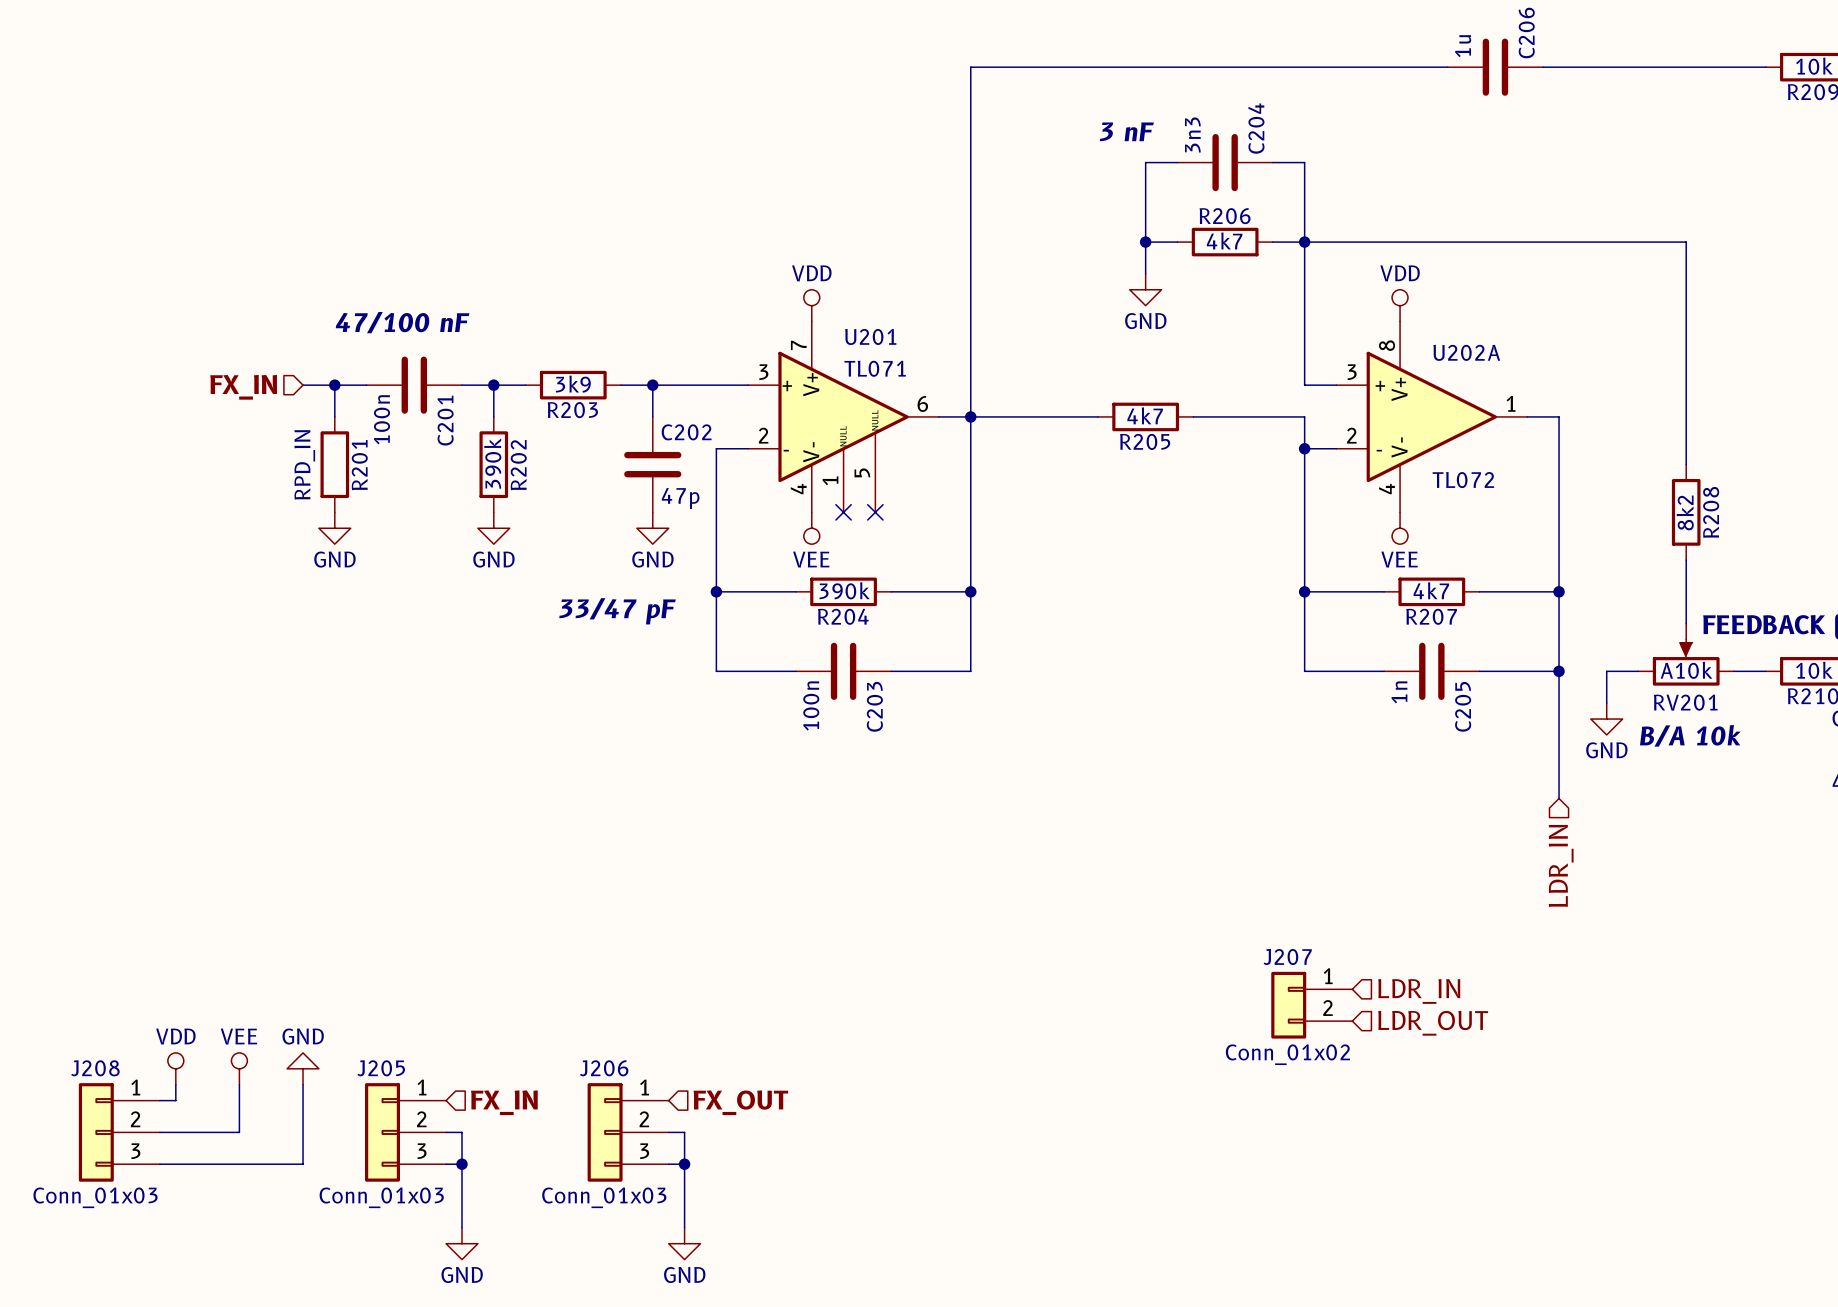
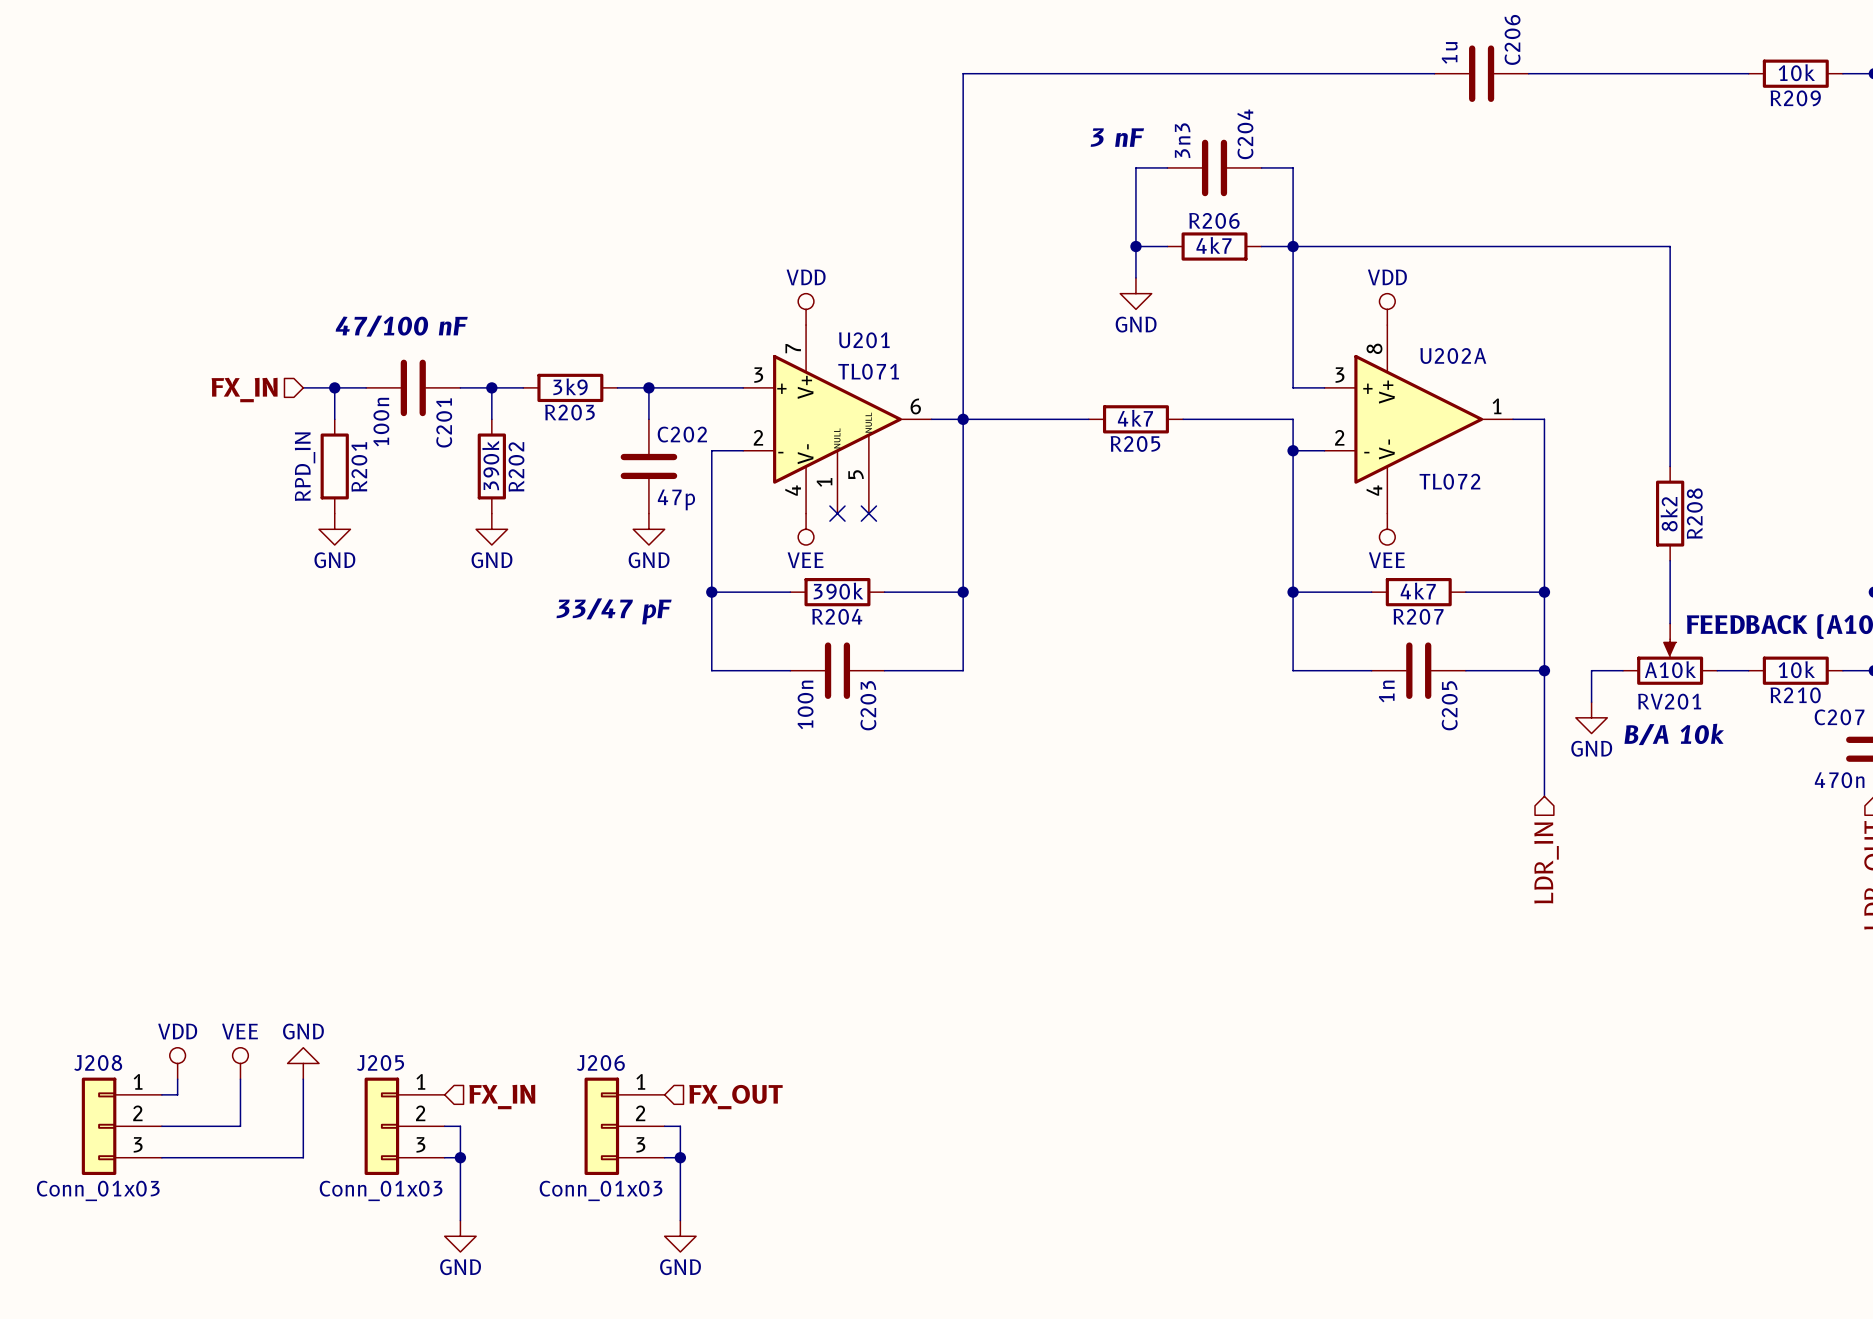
hierarchical label: LDR_IN (1419, 991) -> none
J207: Conn_01x02 (1311, 1005) -> none
hierarchical label: LDR_OUT (1433, 1023) -> none

